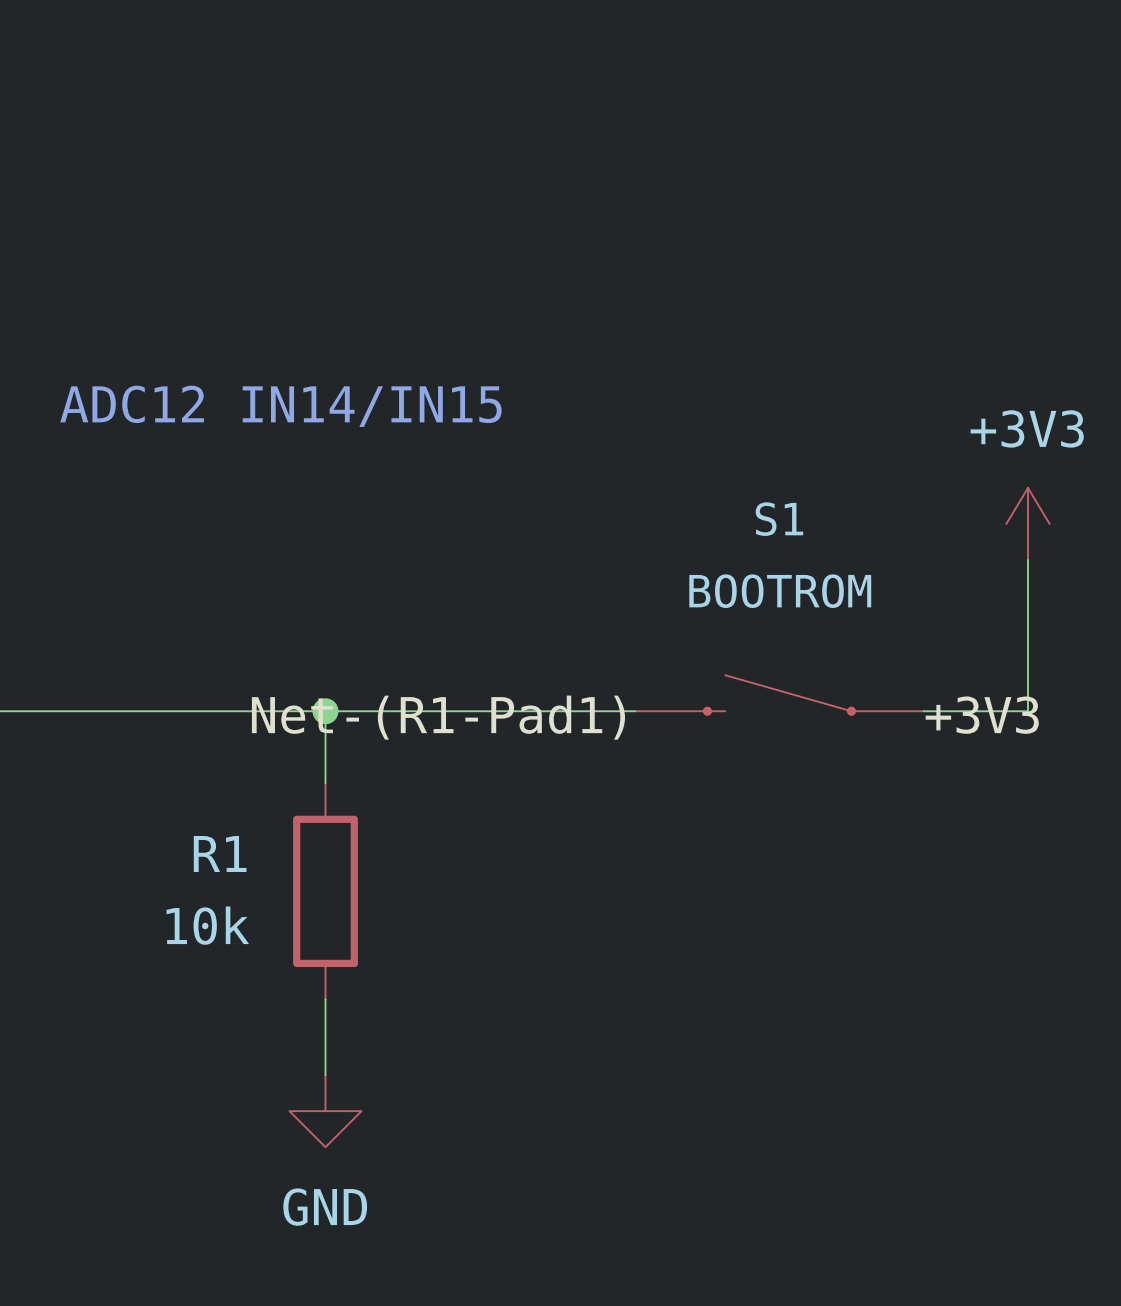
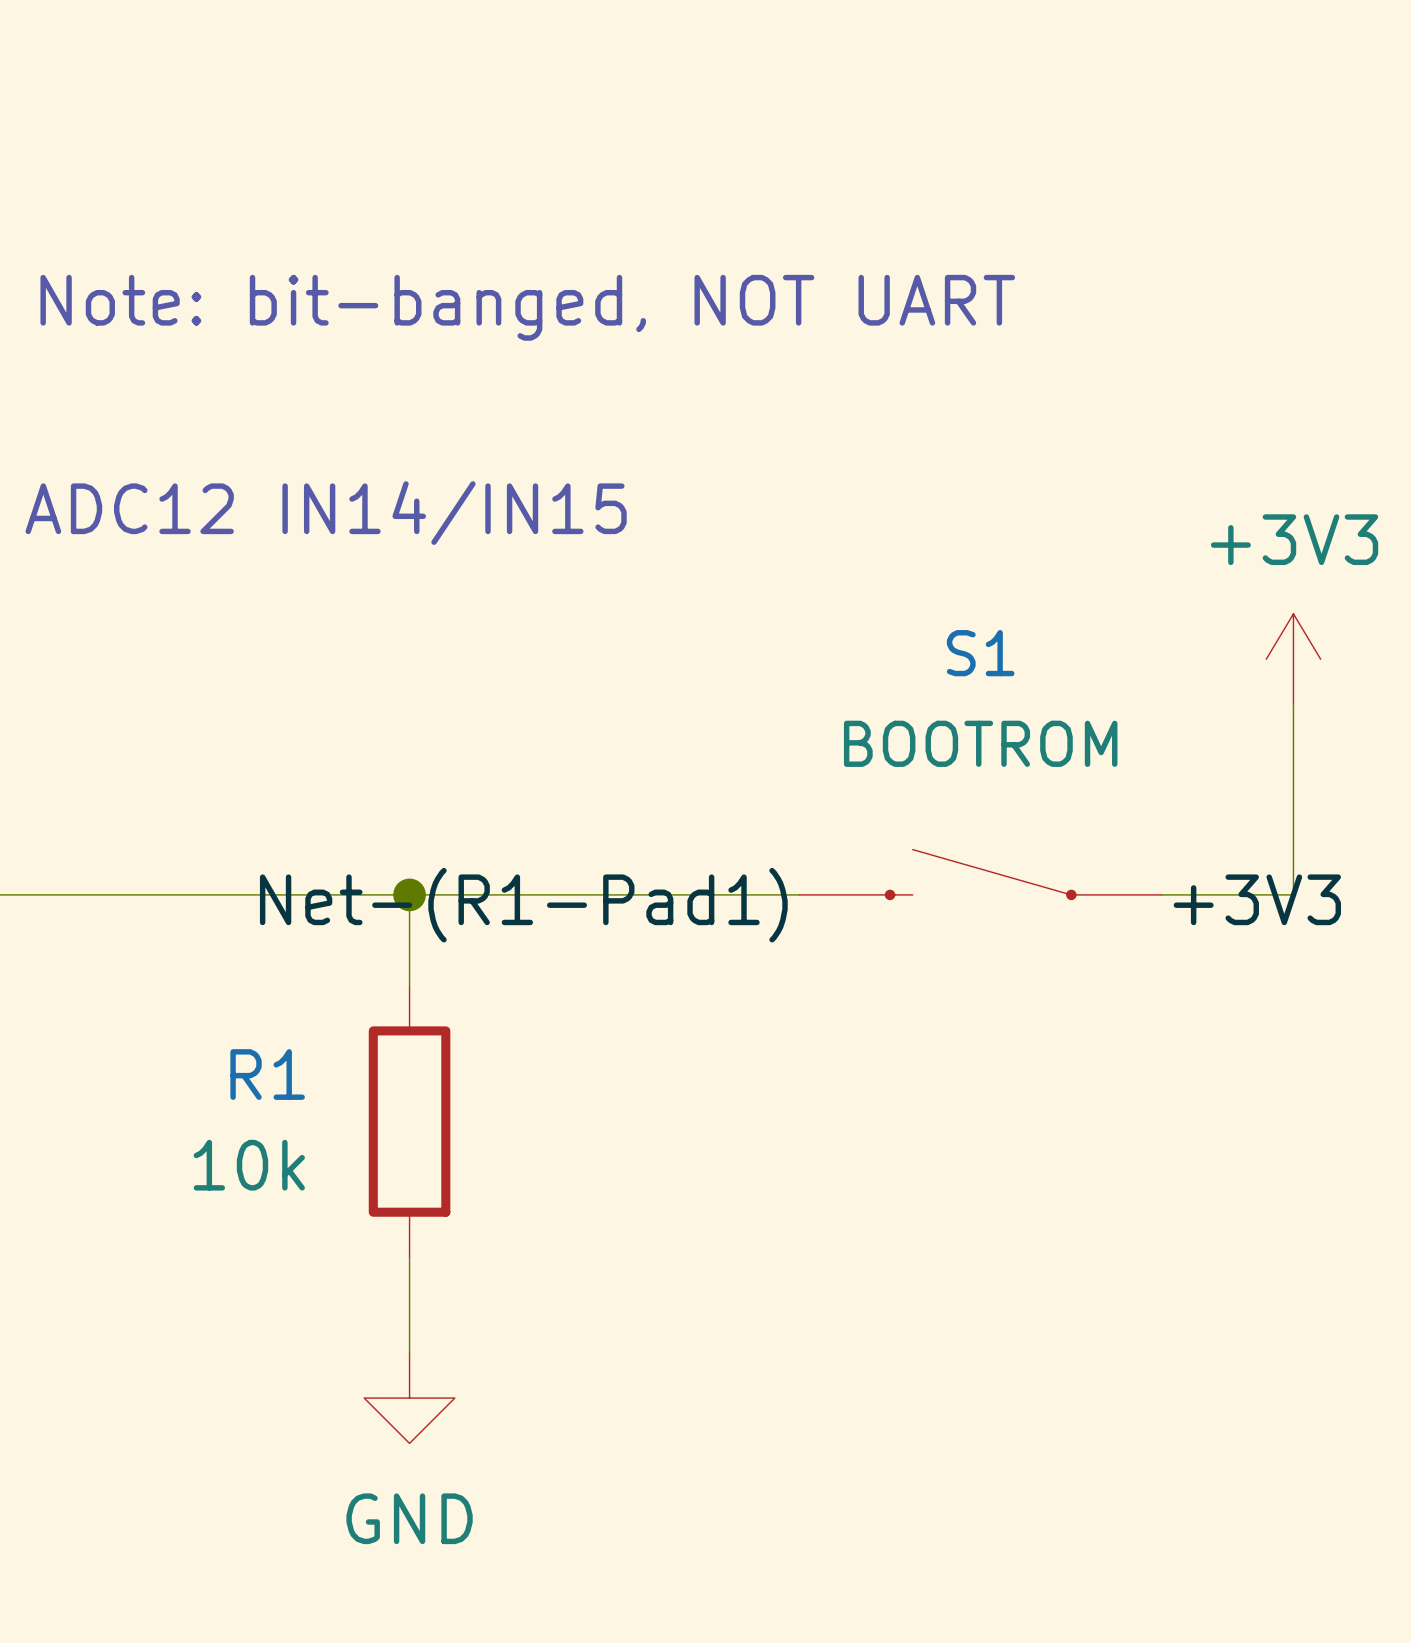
text: none -> Note: bit-banged, NOT UART (527, 307)

